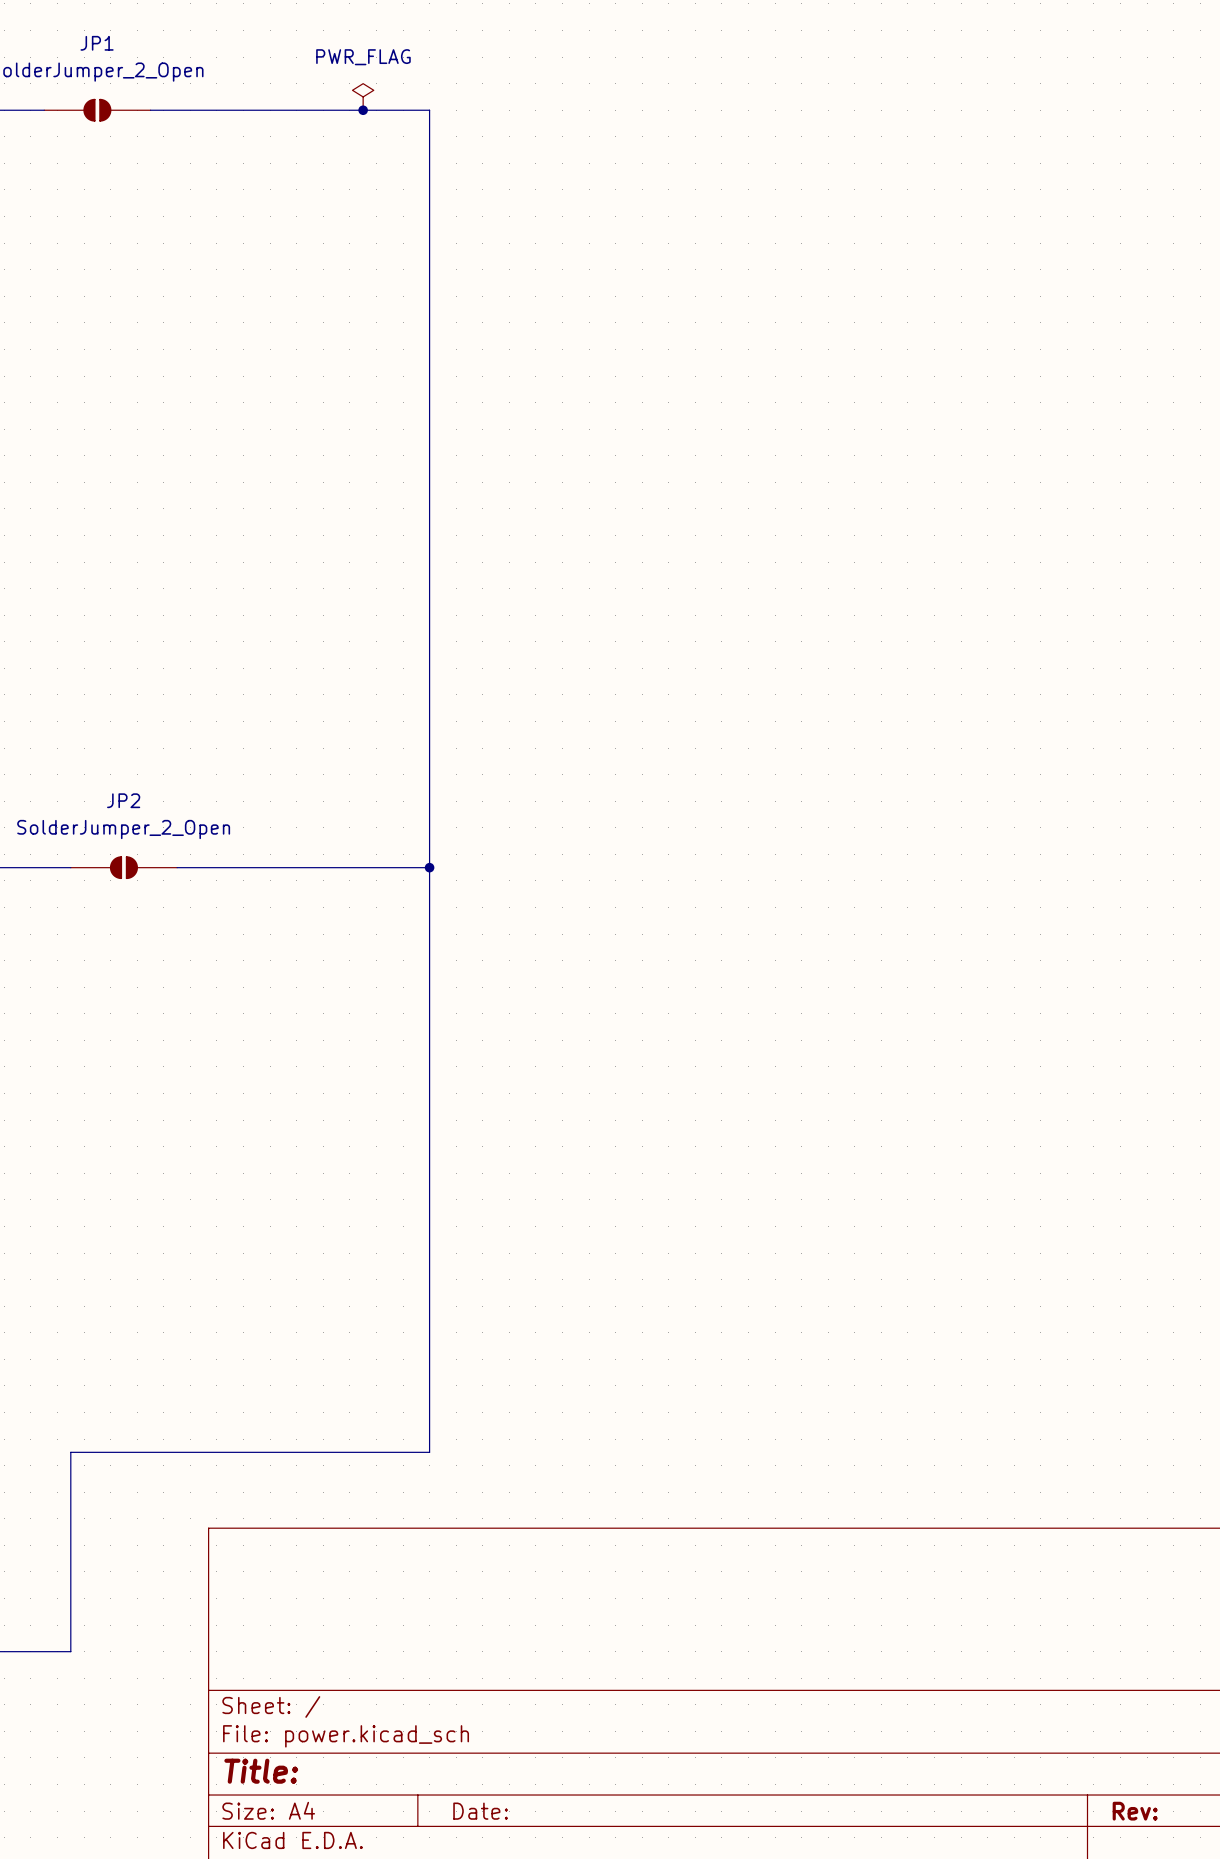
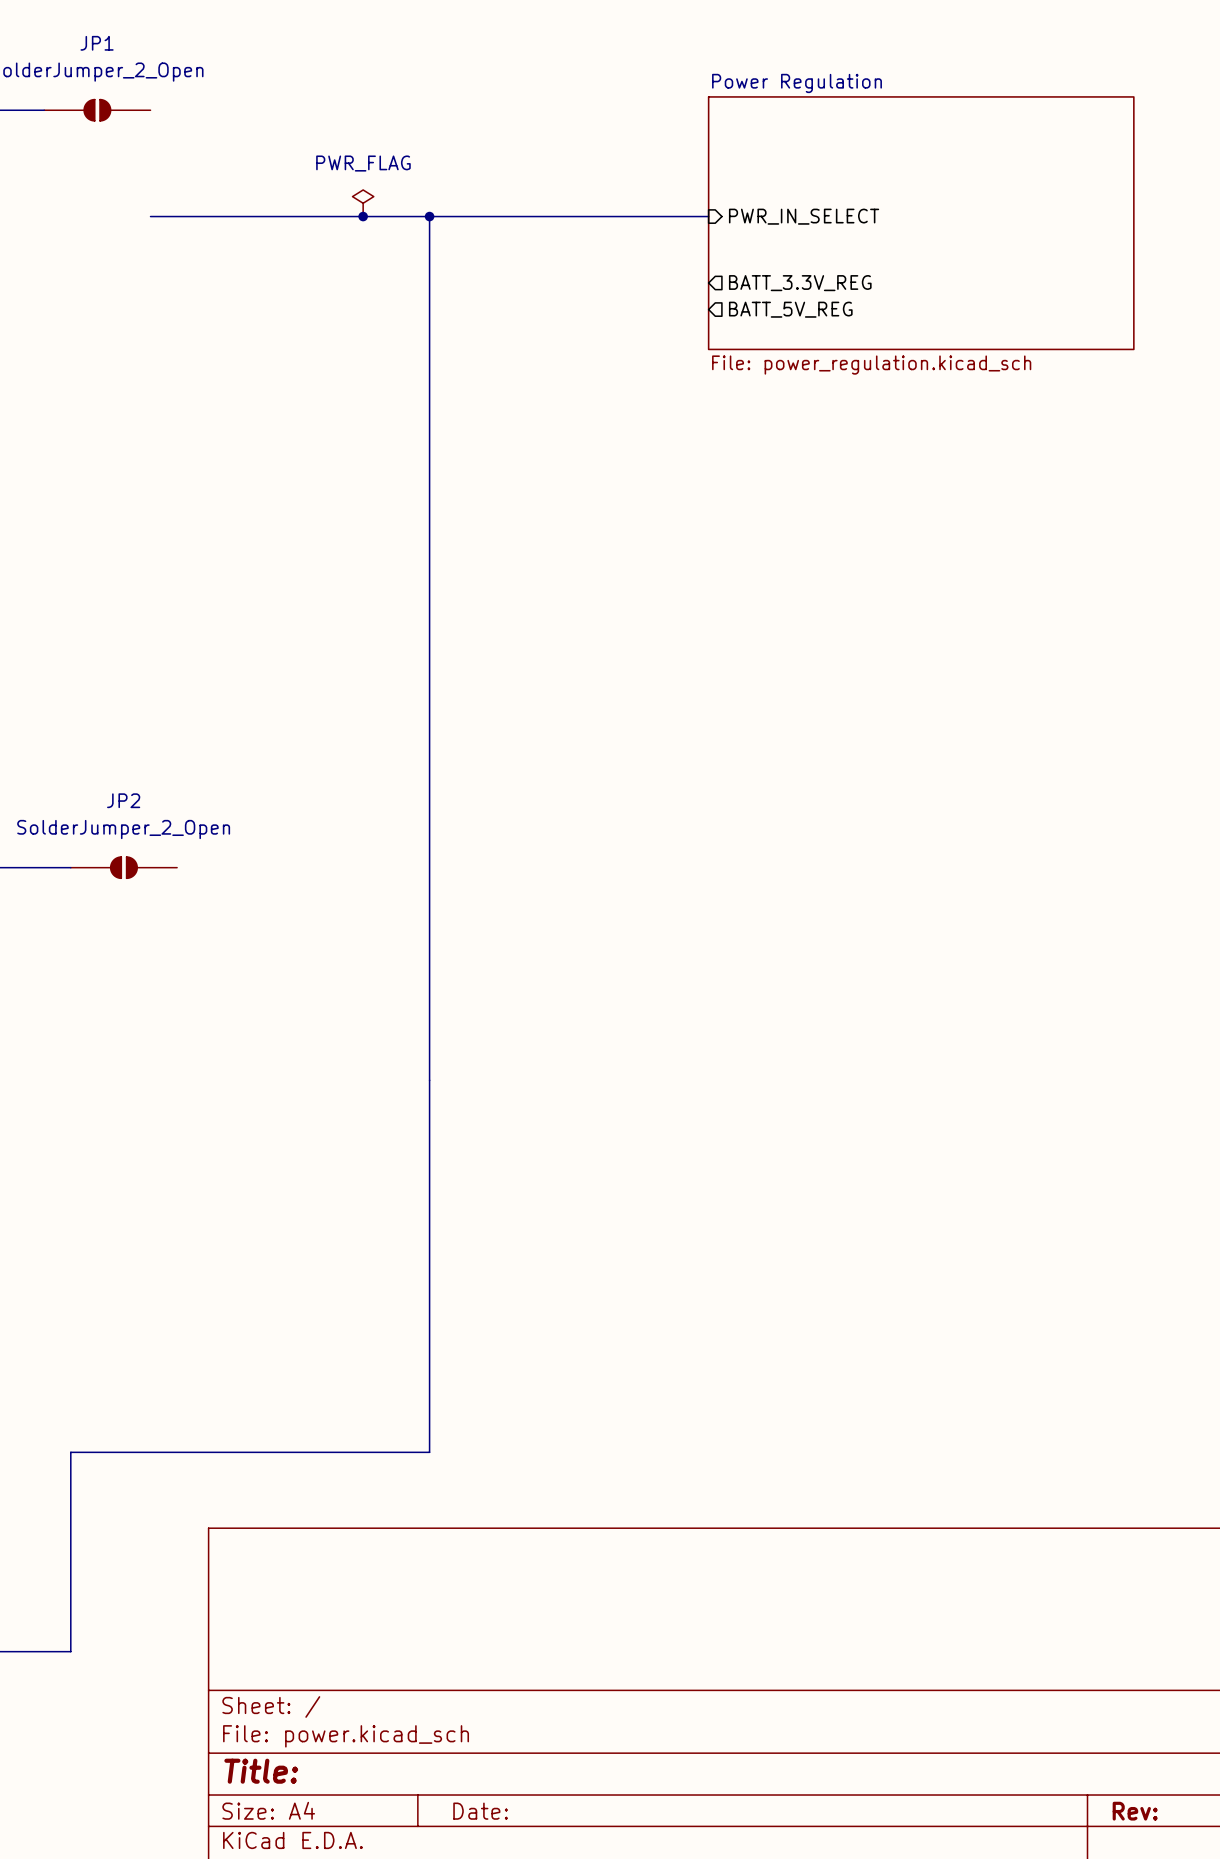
power symbol position: PWR_FLAG (363, 96) -> PWR_FLAG (363, 203)
wire: (150, 110) (429, 110) (429, 216) -> none
junction: (363, 110) -> none
wire: none -> (150, 216) (708, 216)
junction: none -> (363, 216)
junction: none -> (429, 216)
sheet pin: none -> PWR_IN_SELECT (804, 216)
sheet Power Regulation: none -> File: power_regulation.kicad_sch (921, 223)
sheet pin: none -> BATT_3.3V_REG (800, 283)
sheet pin: none -> BATT_5V_REG (790, 309)
wire: (177, 867) (429, 867) -> none
junction: (429, 867) -> none

